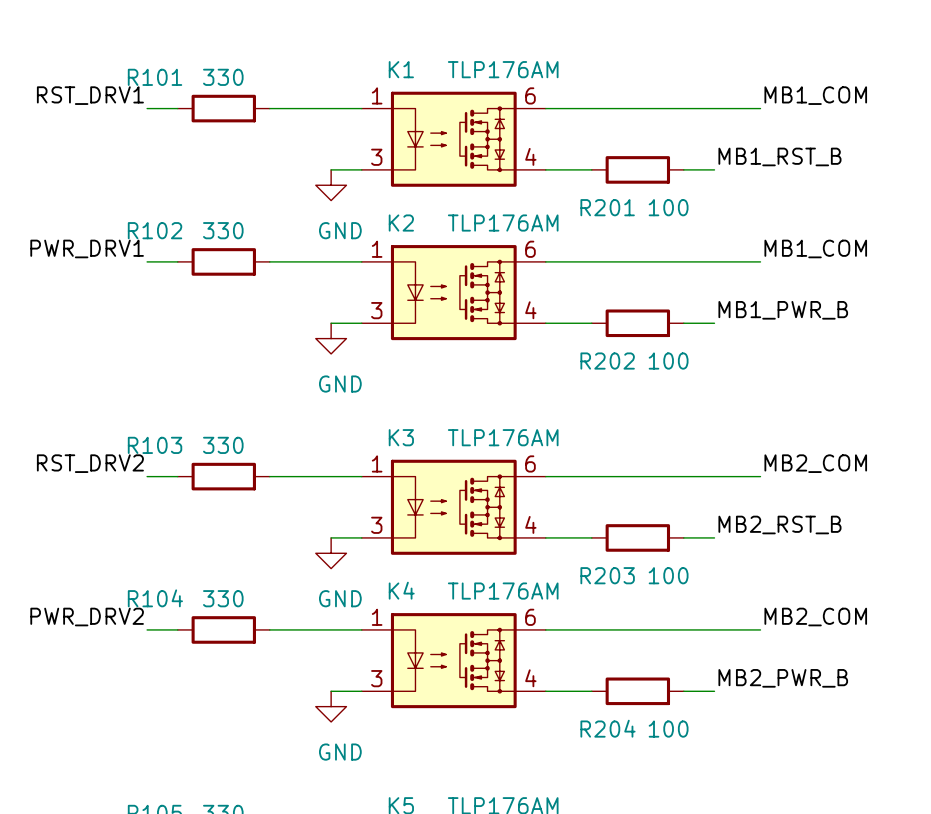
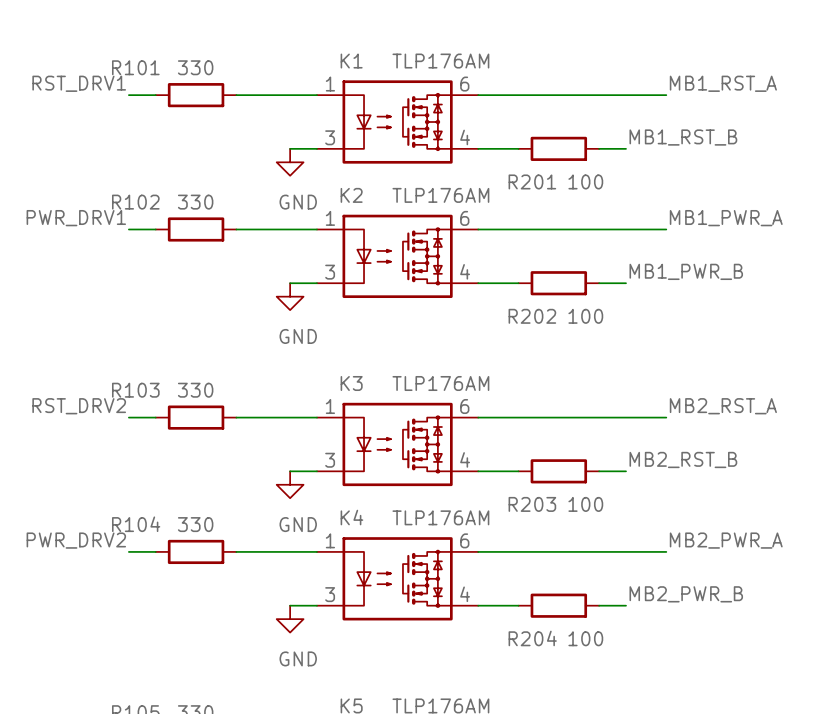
label: MB1_COM (815, 95) -> MB1_RST_A (723, 83)
label: MB1_COM (815, 248) -> MB1_PWR_A (726, 218)
label: MB2_COM (815, 463) -> MB2_RST_A (723, 406)
label: MB2_COM (815, 617) -> MB2_PWR_A (726, 540)

